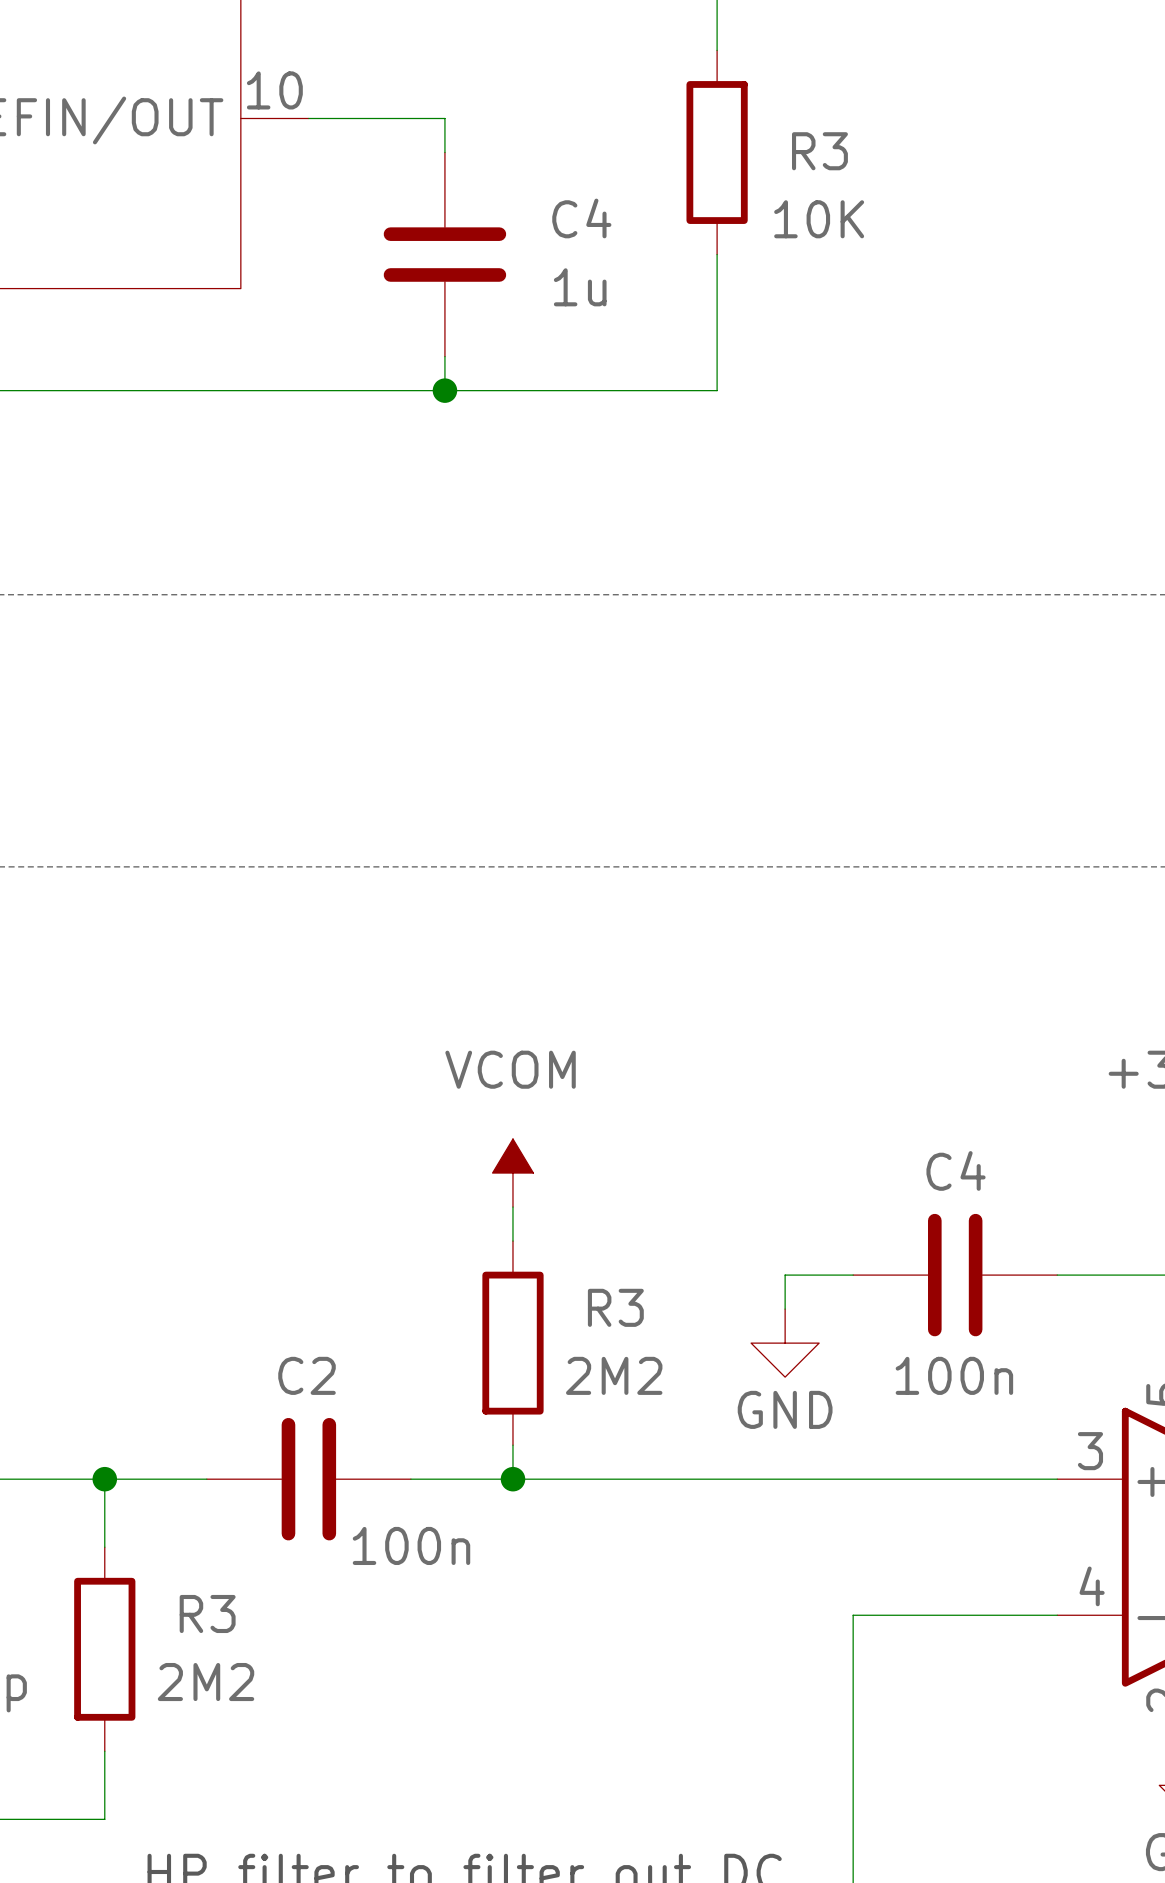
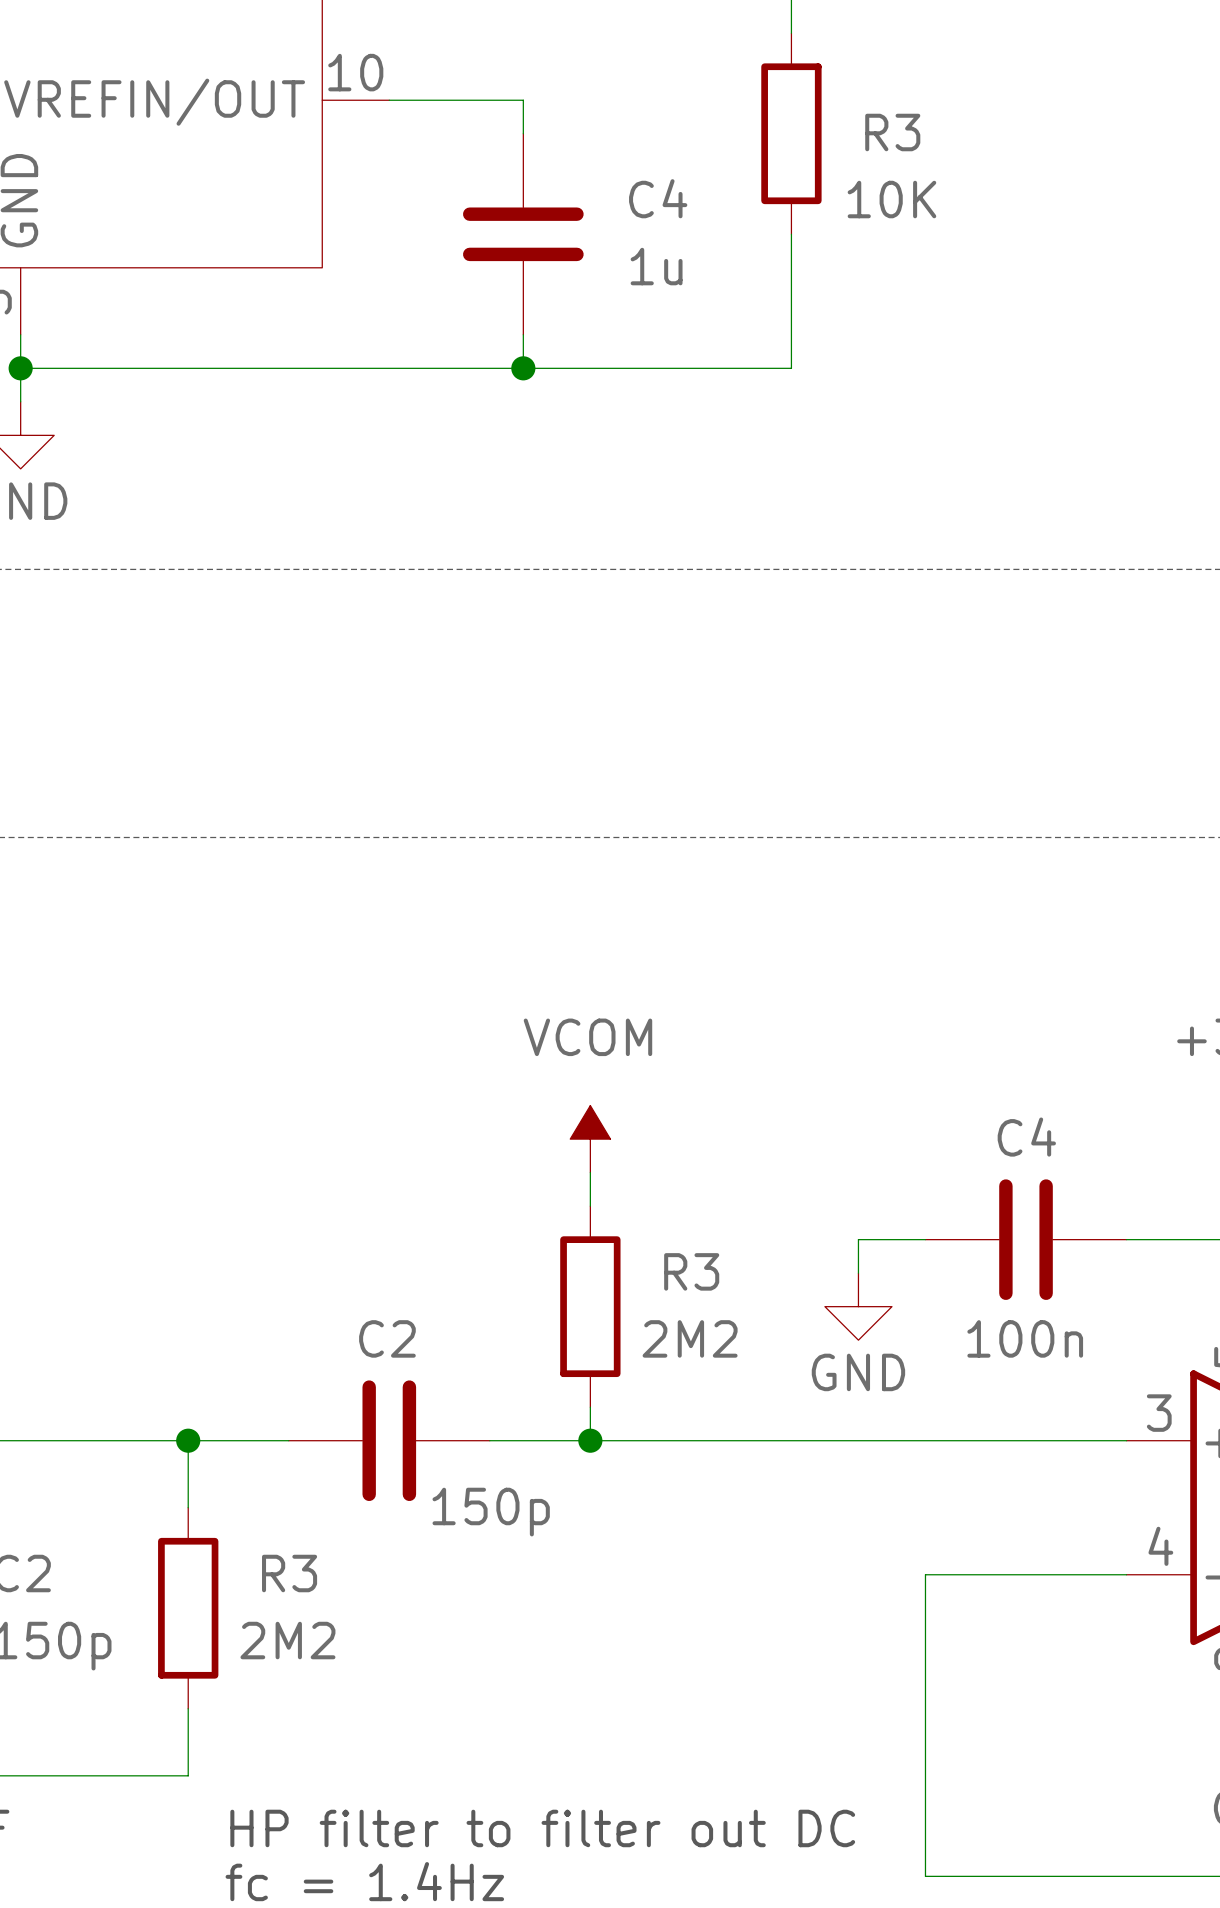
C2 value: 100n (411, 1545) -> 150p (491, 1512)

